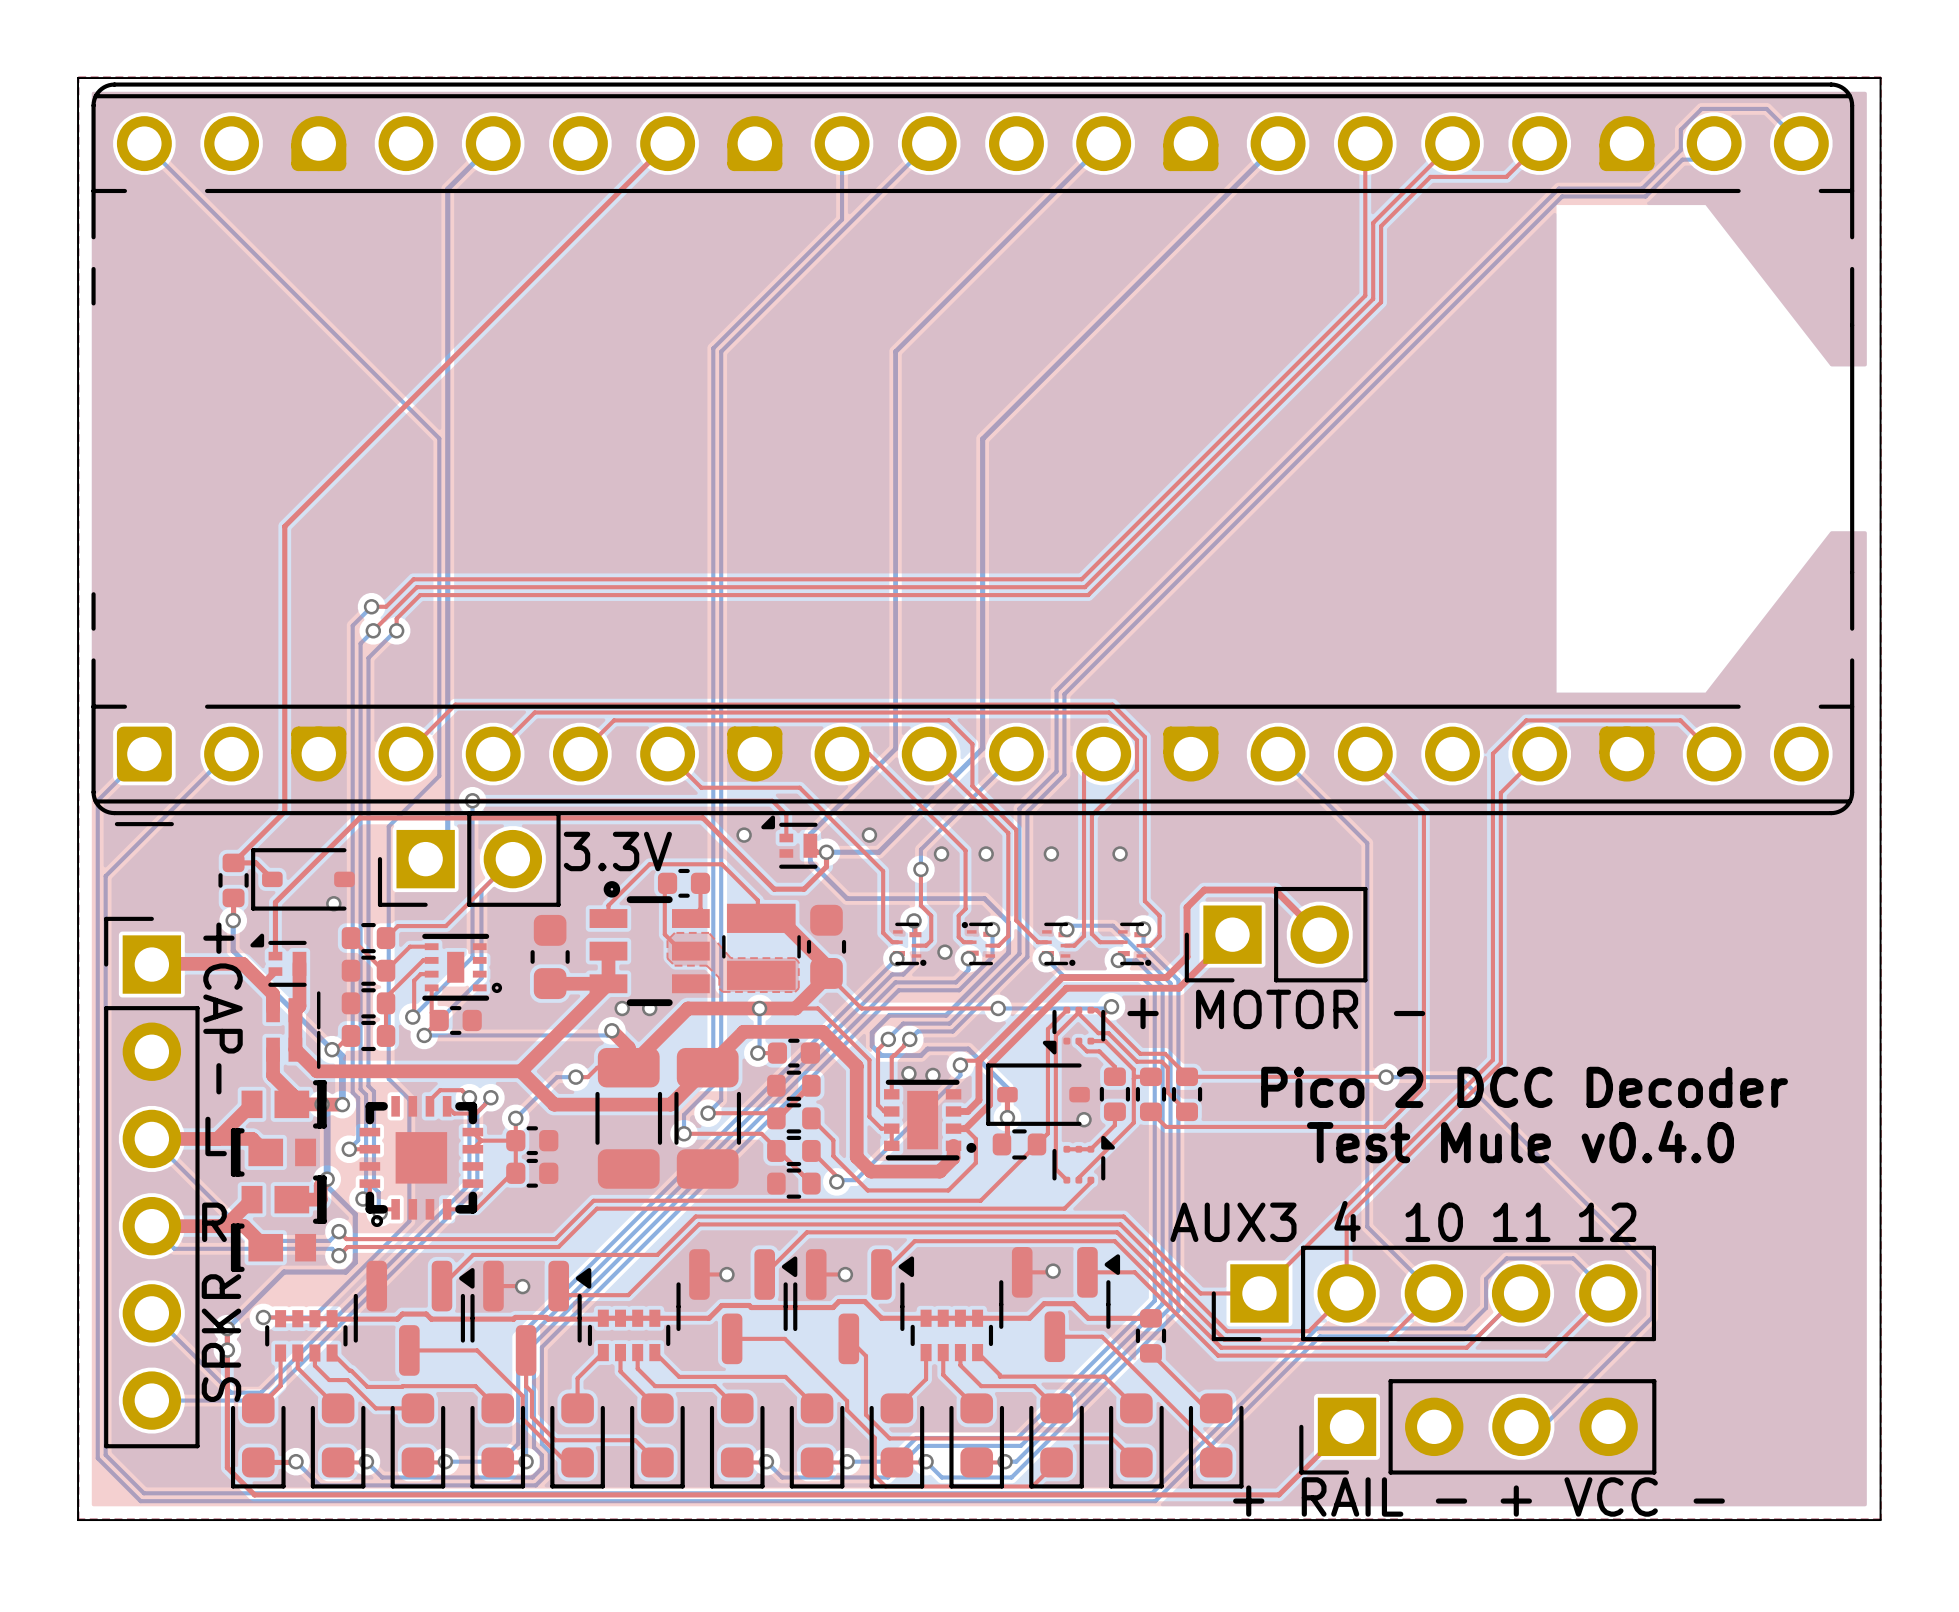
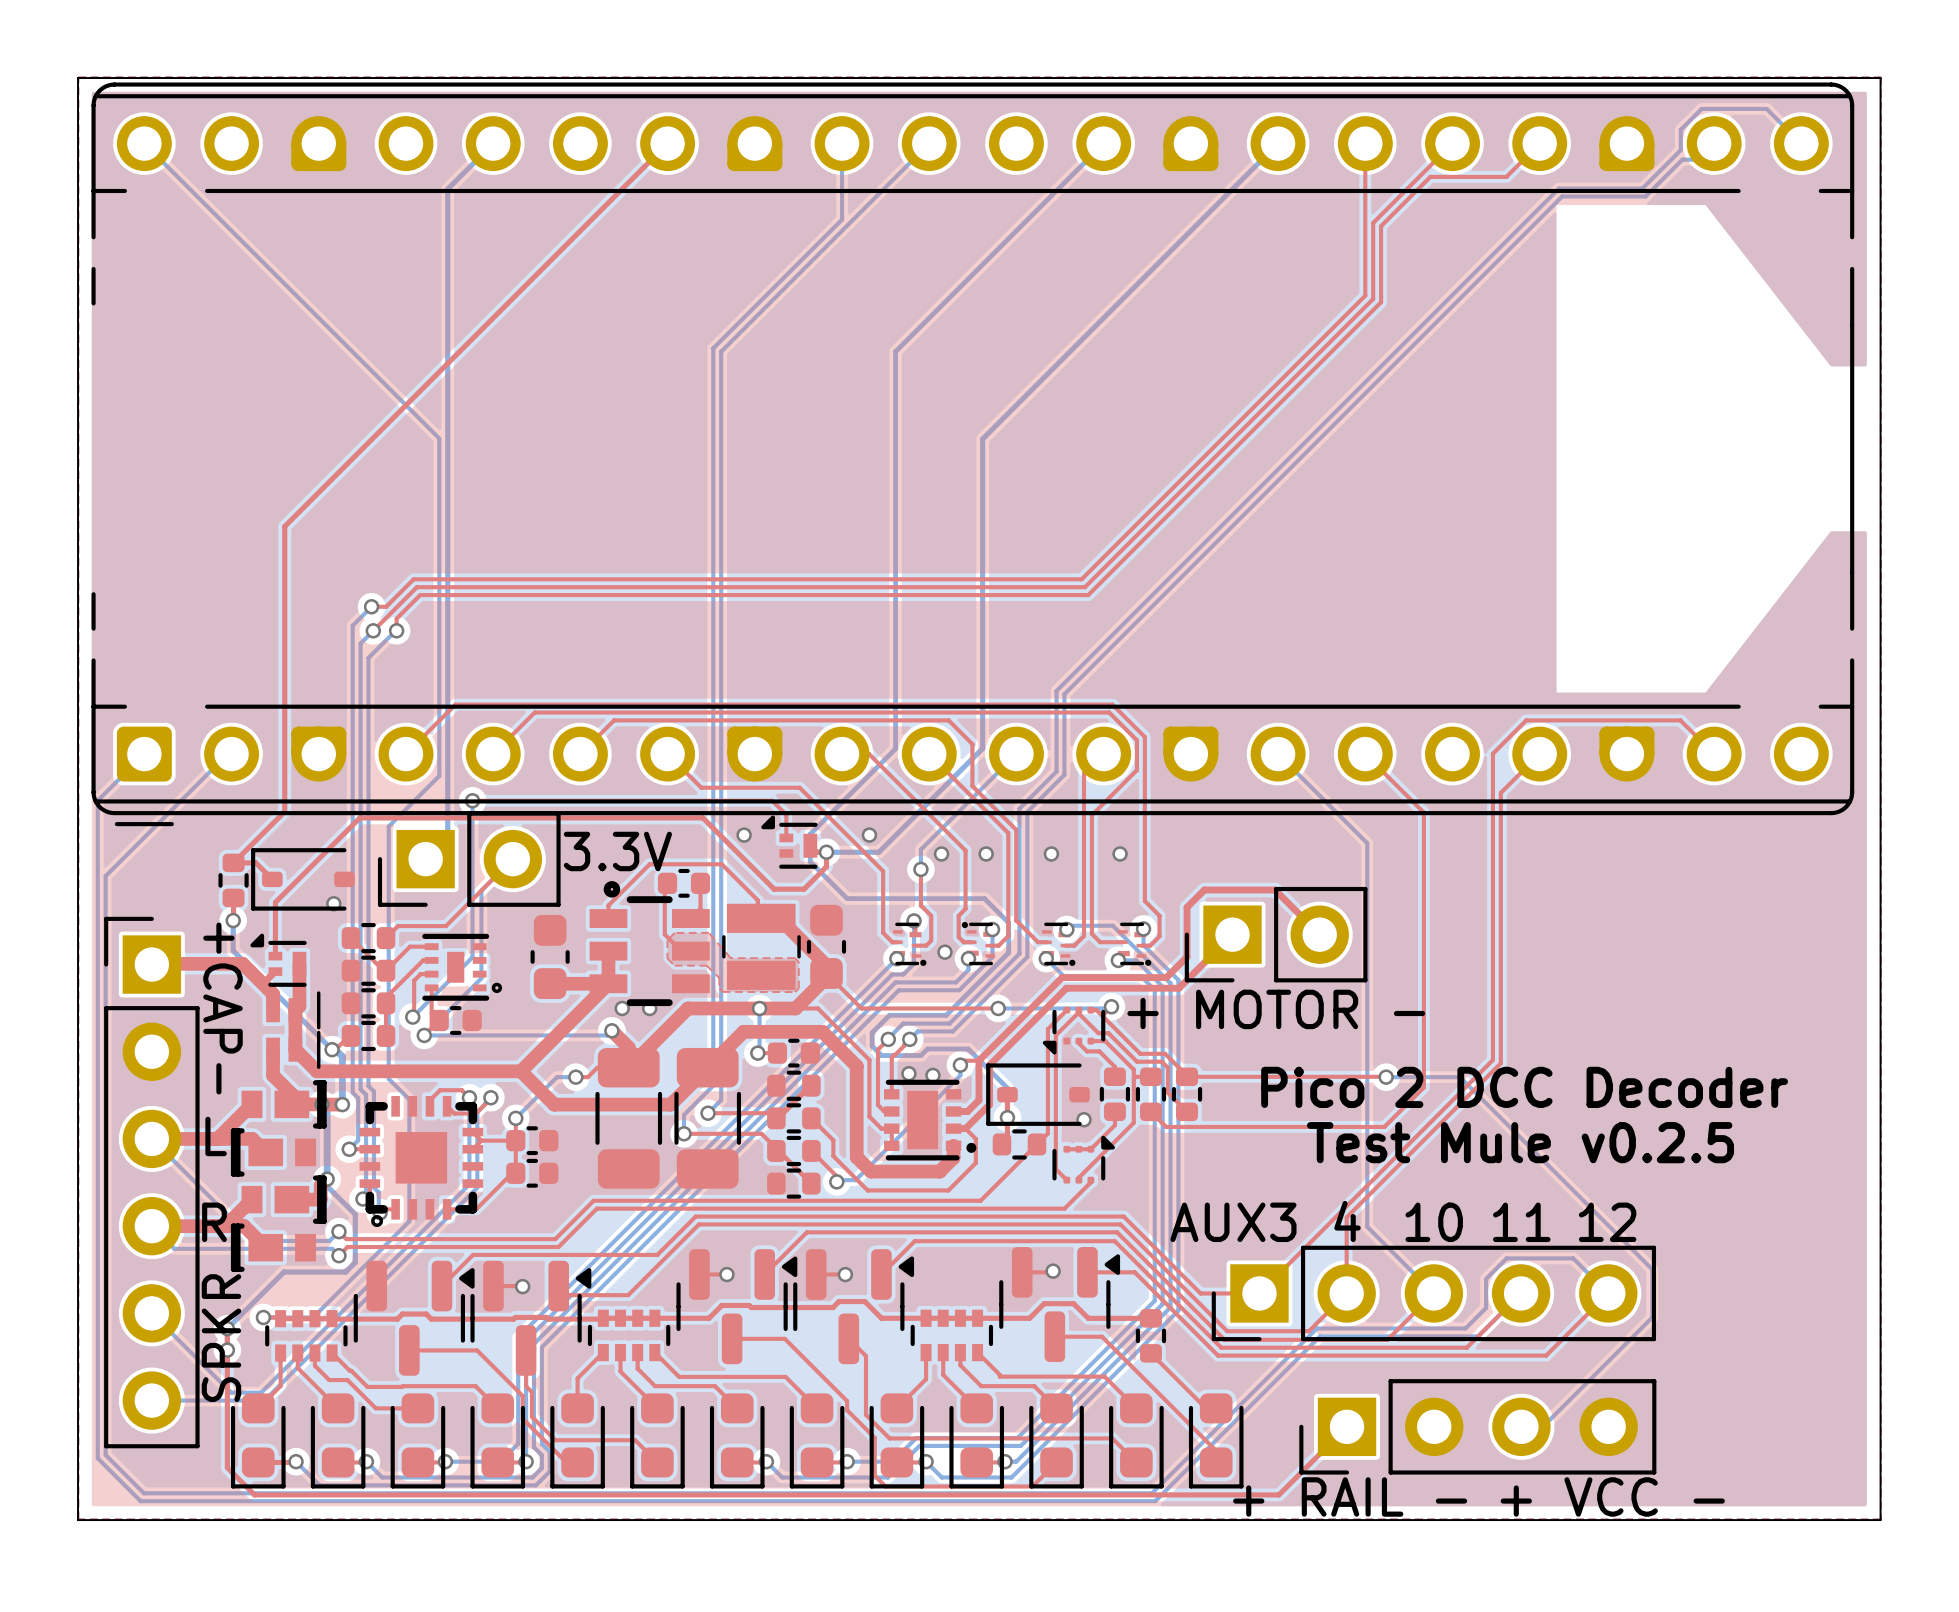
text: Test Mule v0.4.0 (1520, 1141) -> Test Mule v0.2.5 (1520, 1142)

